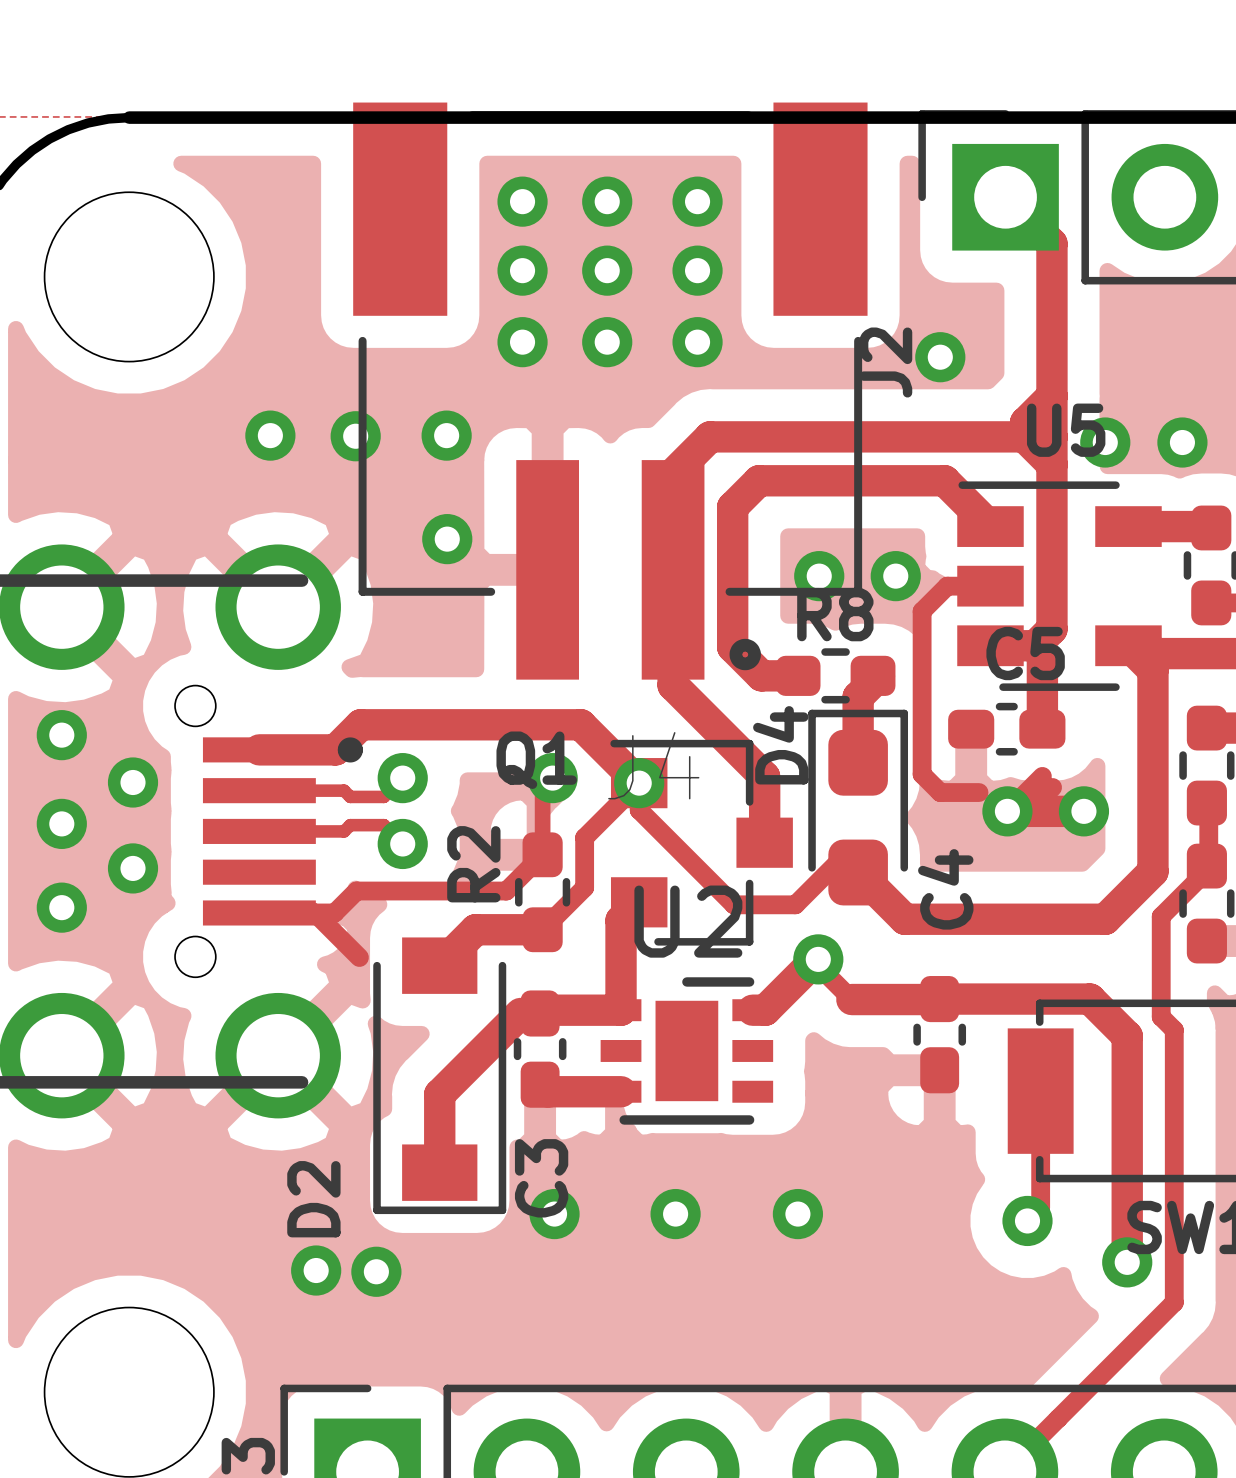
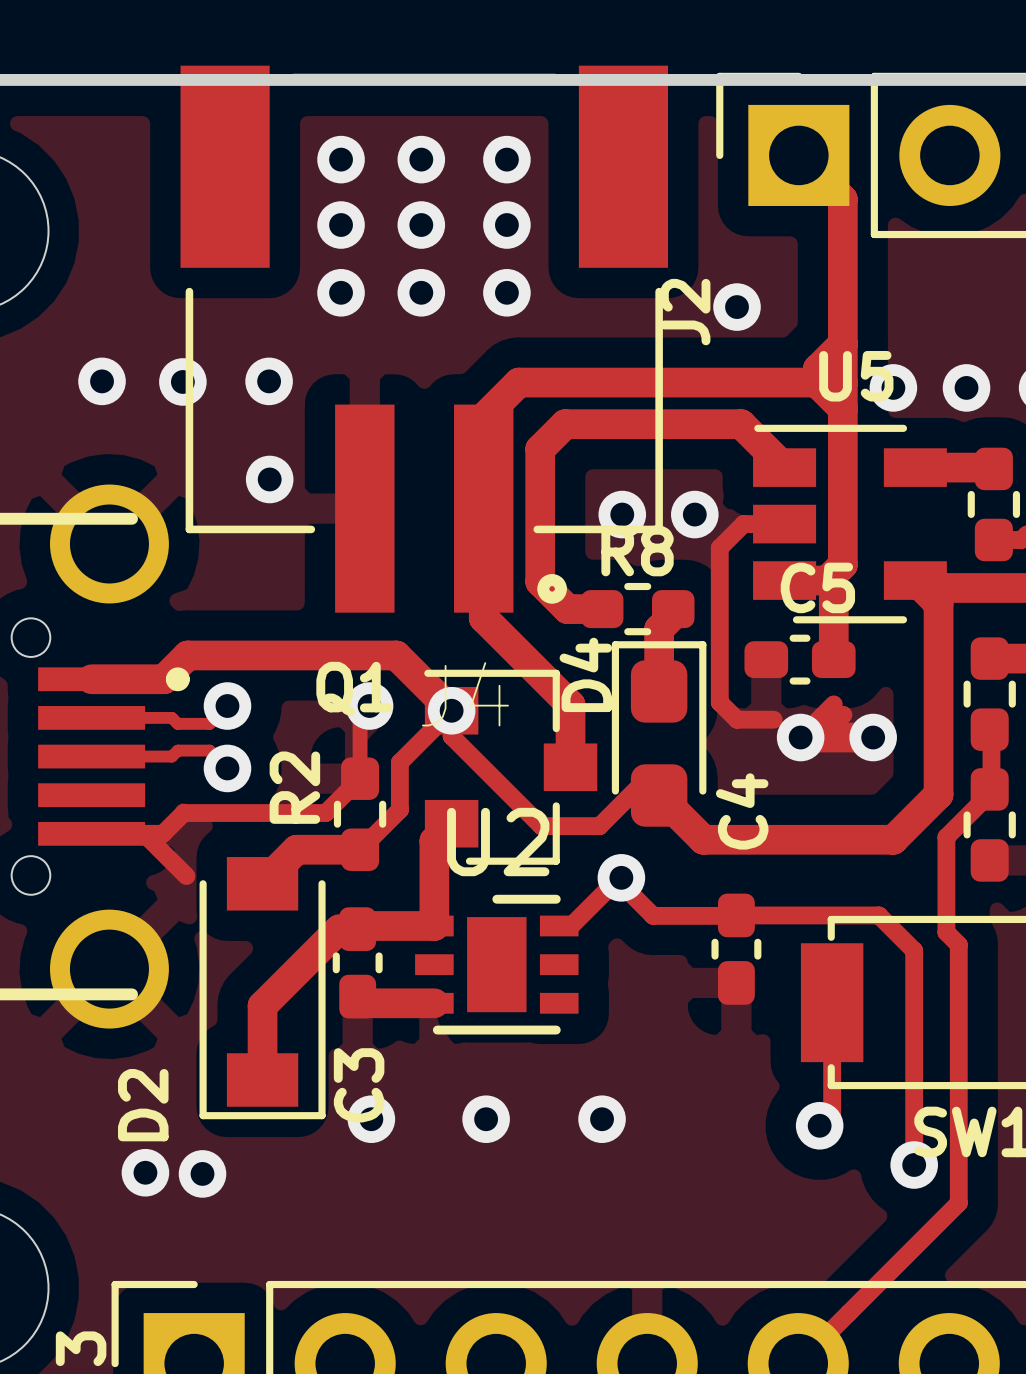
track width: thick (816, 959) (765, 1010) (752, 1010) -> thin (619, 877) (571, 925) (559, 925)
track width: thick (851, 999) (939, 999) -> thin (653, 915) (735, 915)
track width: thick (939, 999) (1090, 999) (1127, 1036) (1127, 1262) -> thin (736, 915) (878, 915) (914, 950) (914, 1165)

